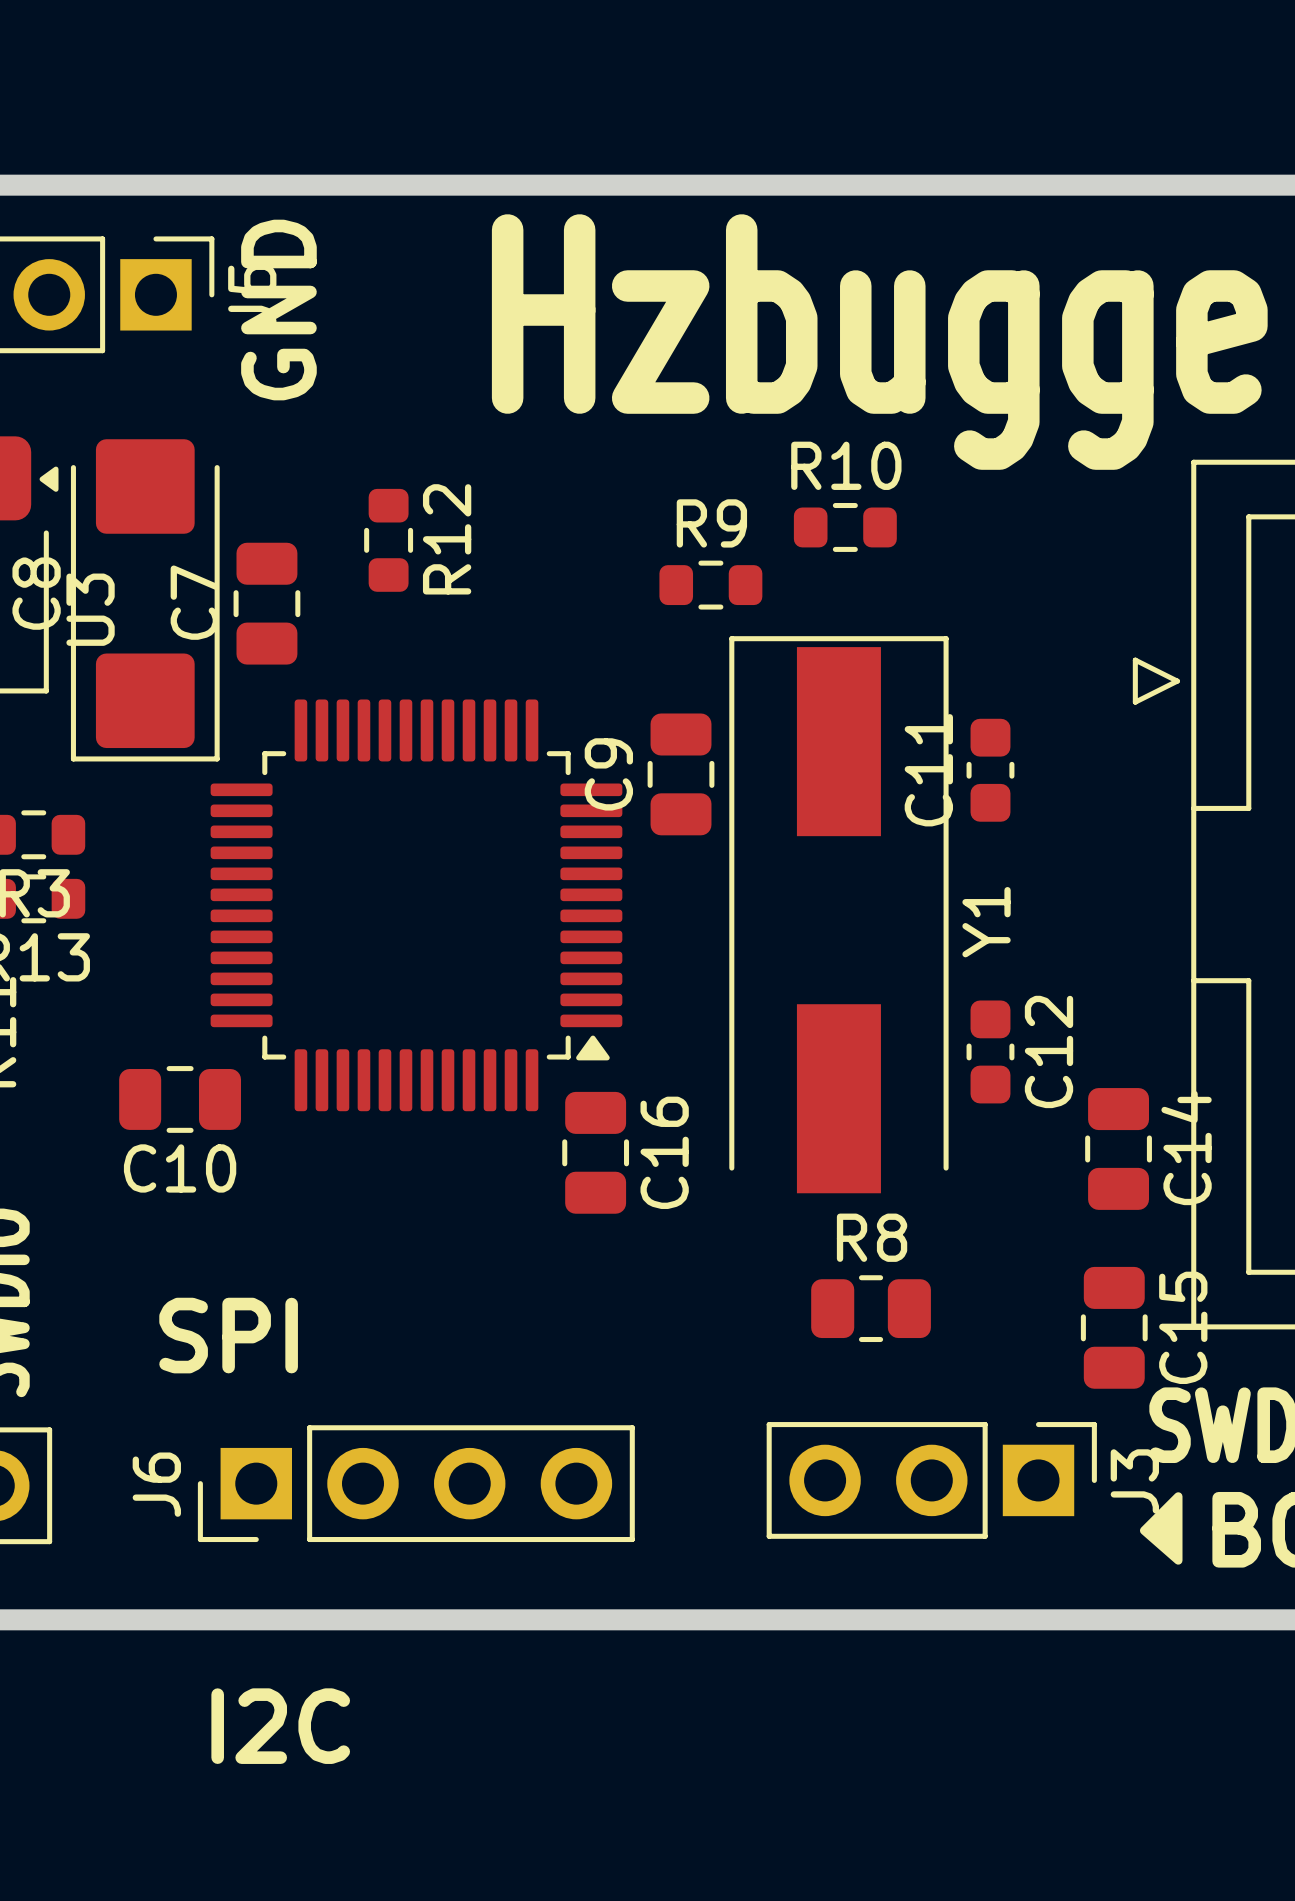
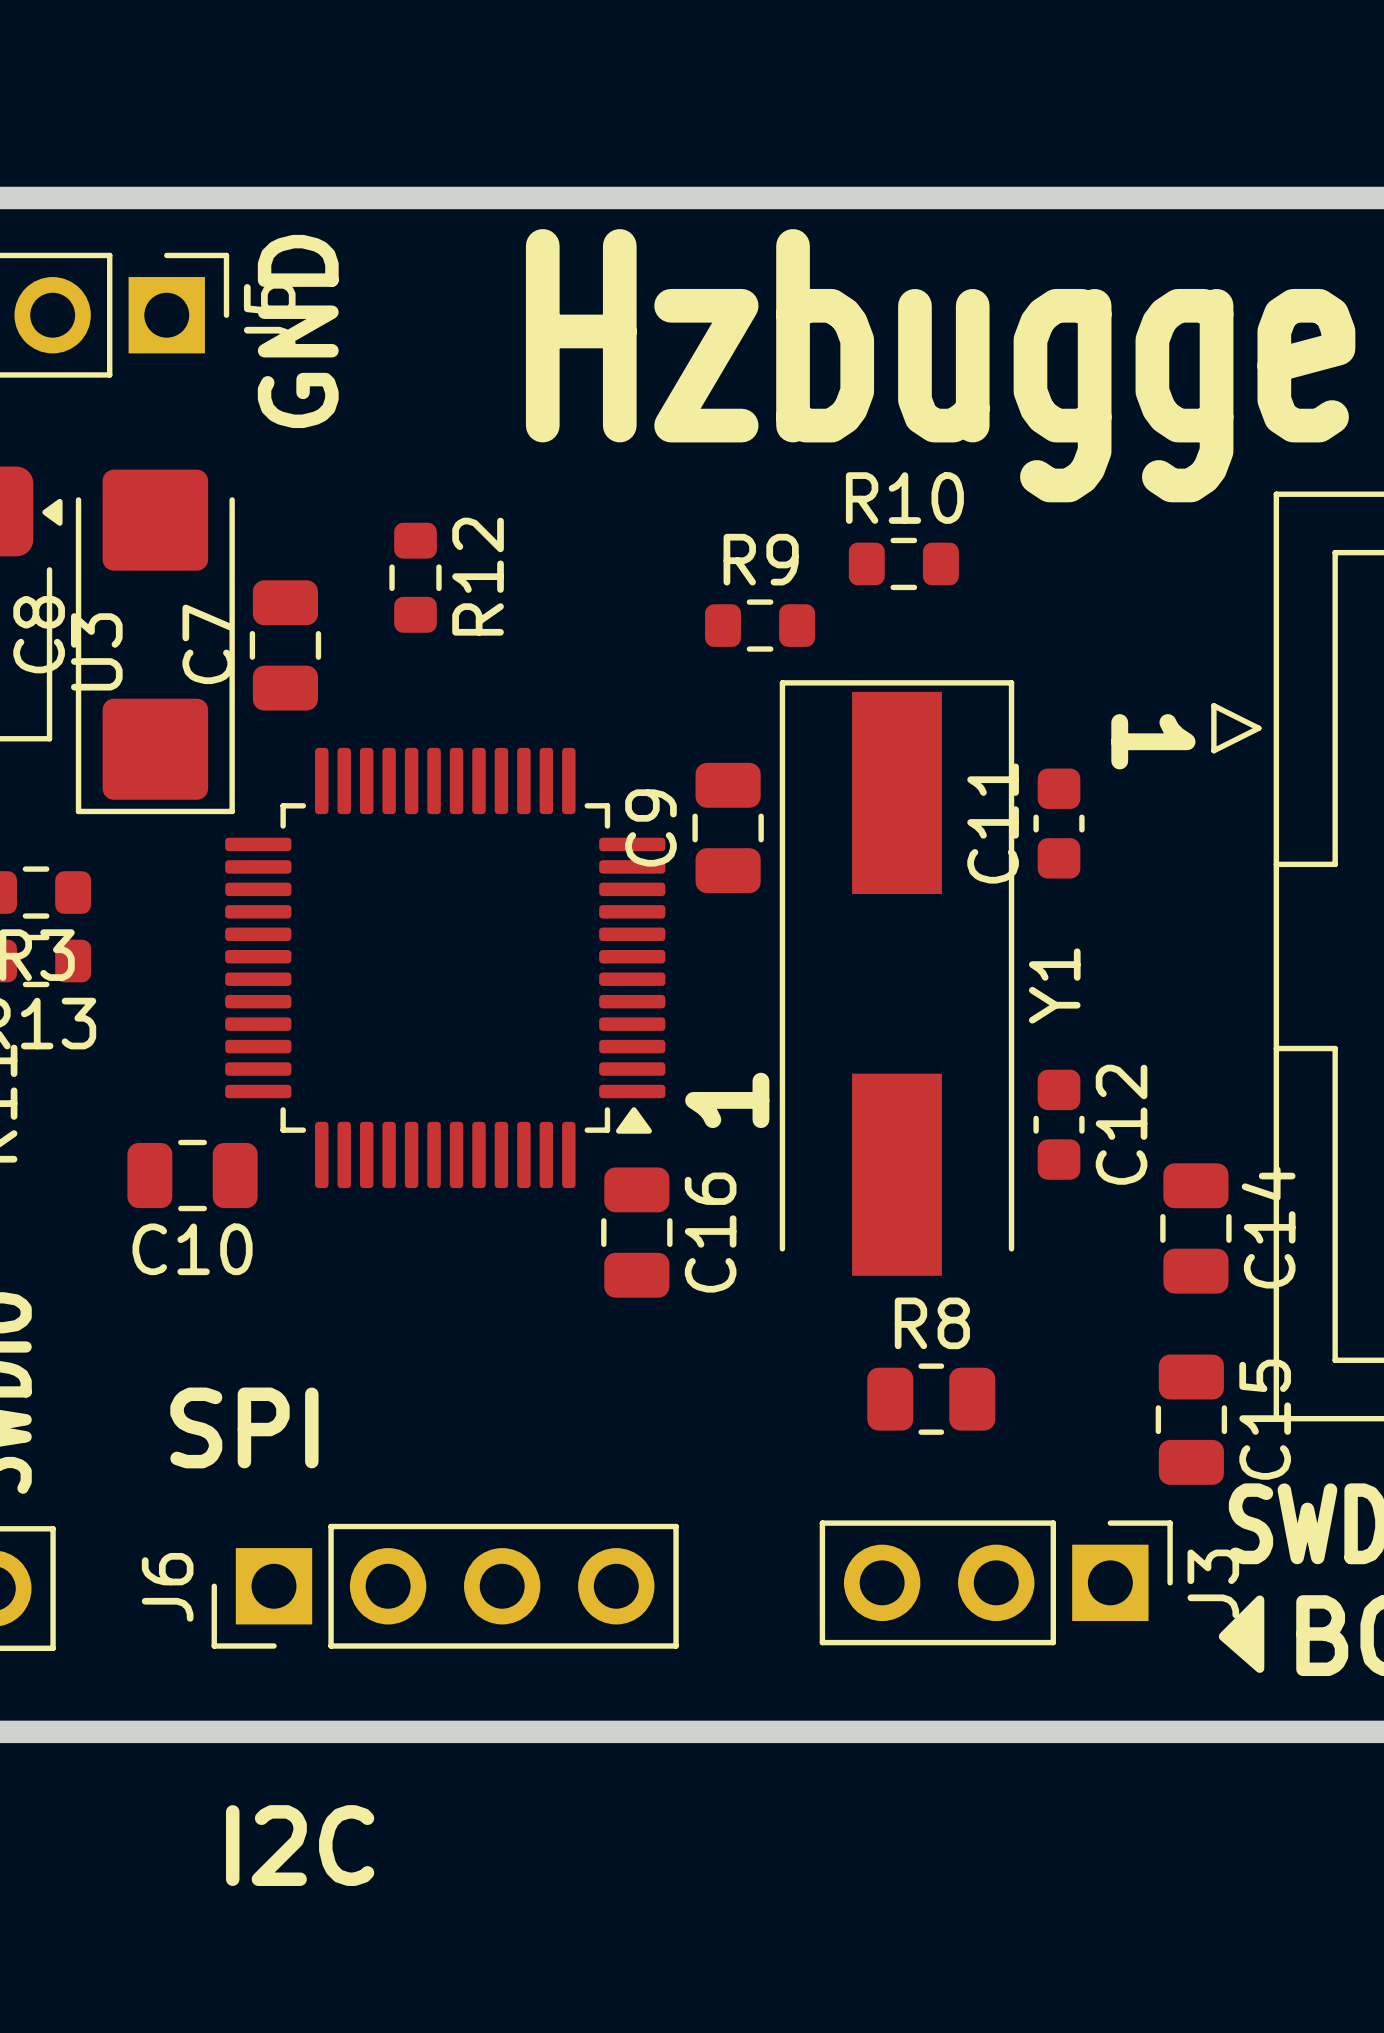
text: none -> 1 (1153, 741)
text: none -> 1 (727, 1100)

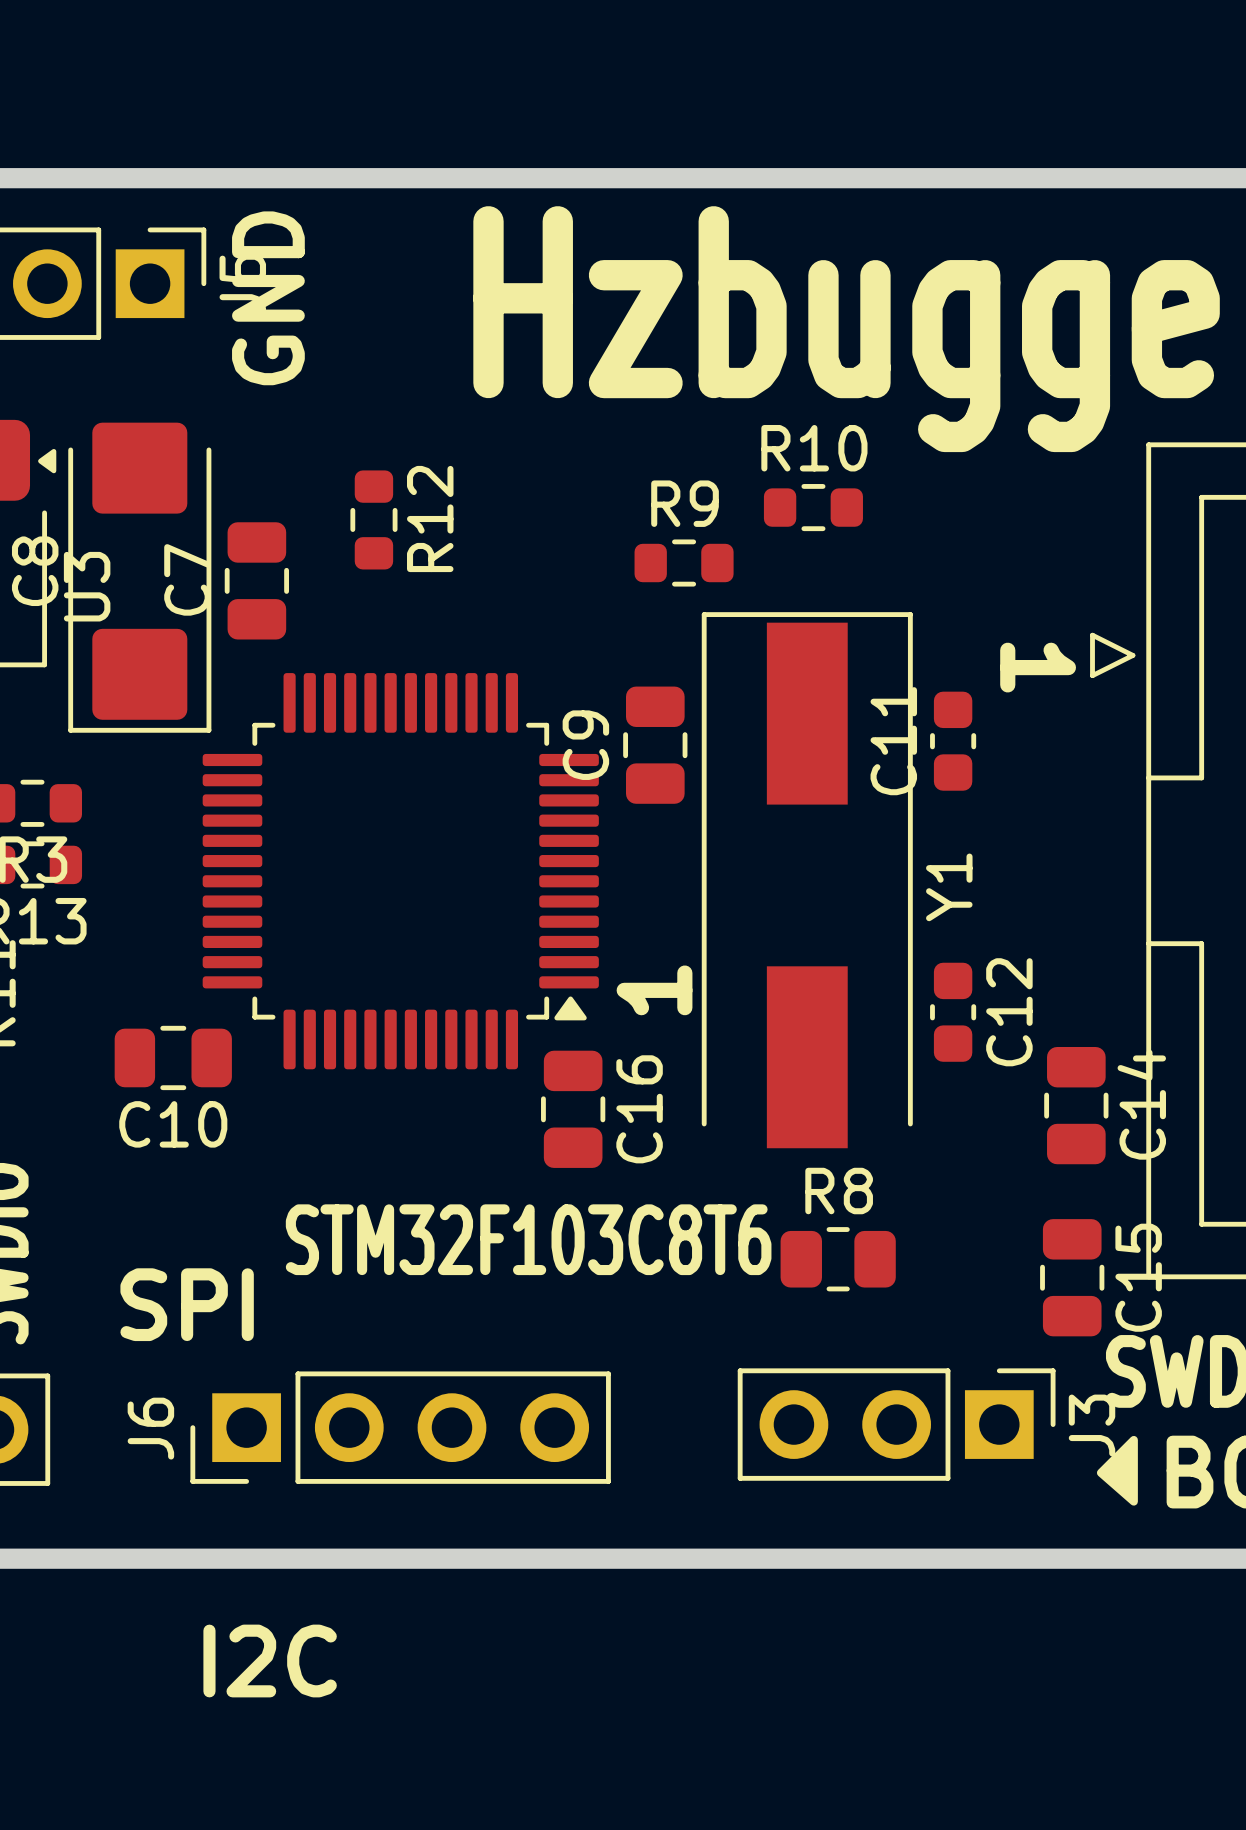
text: none -> STM32F103C8T6 (528, 1239)
text position: SPI (244, 1427) -> SPI (187, 1304)

